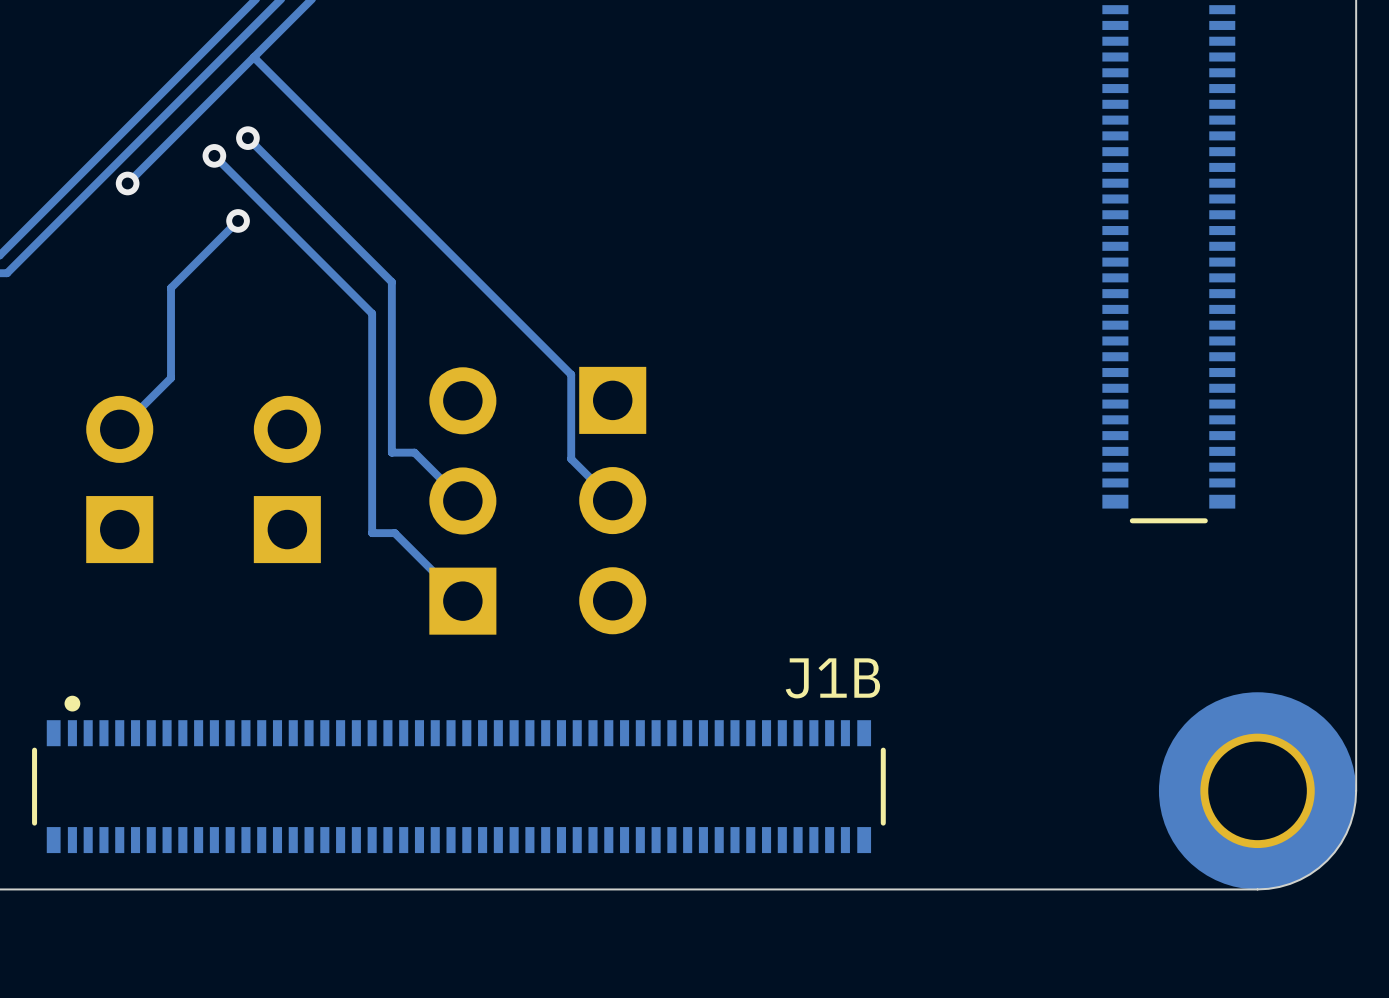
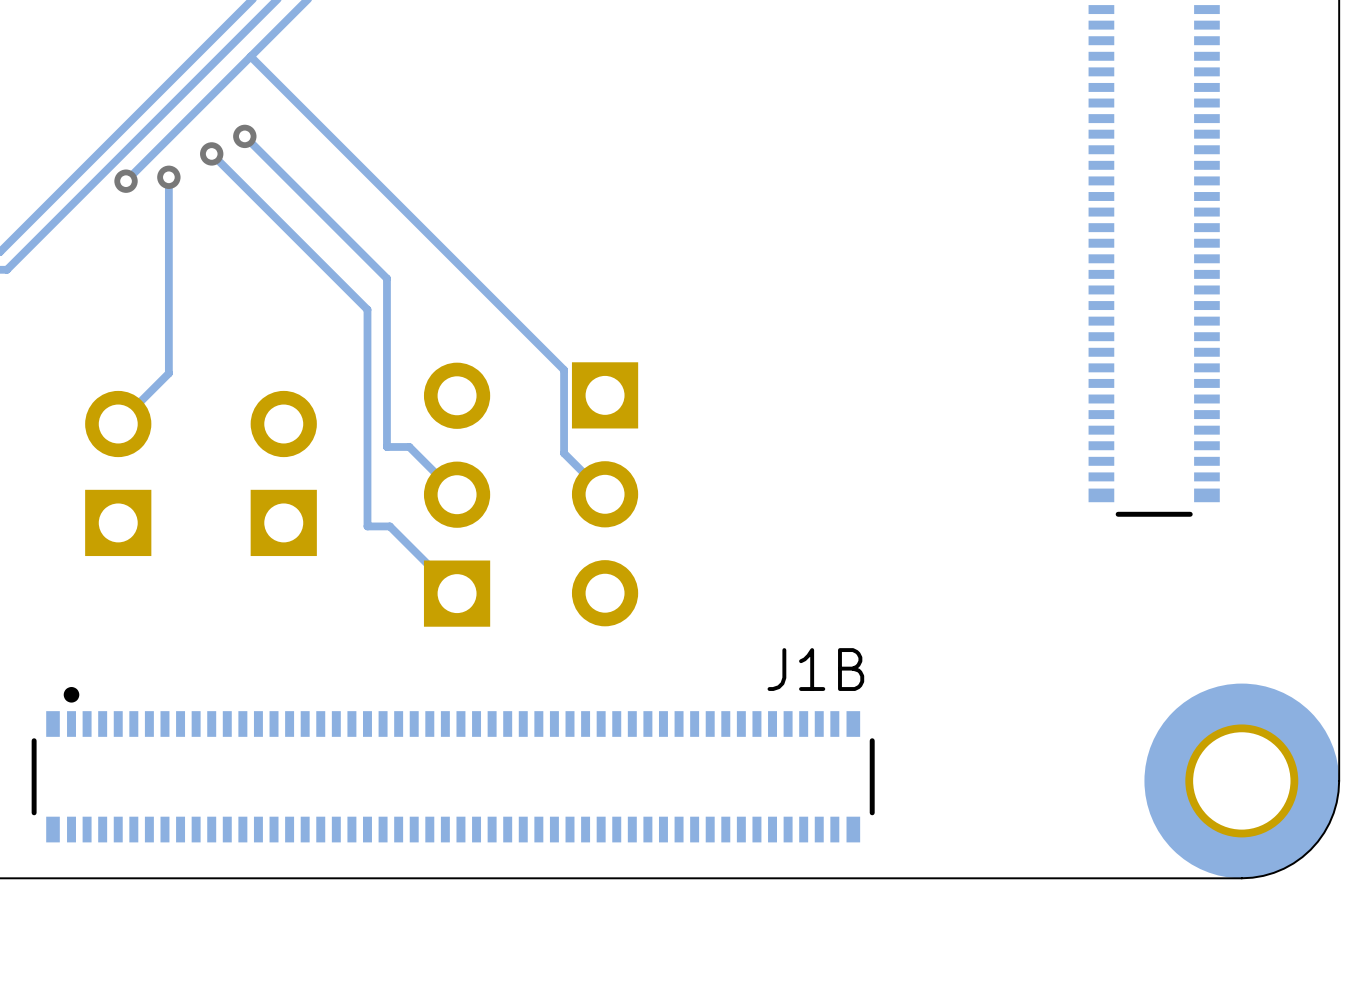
track: (238, 220) (171, 288) -> (168, 177) (168, 284)
via position: (238, 220) -> (168, 177)

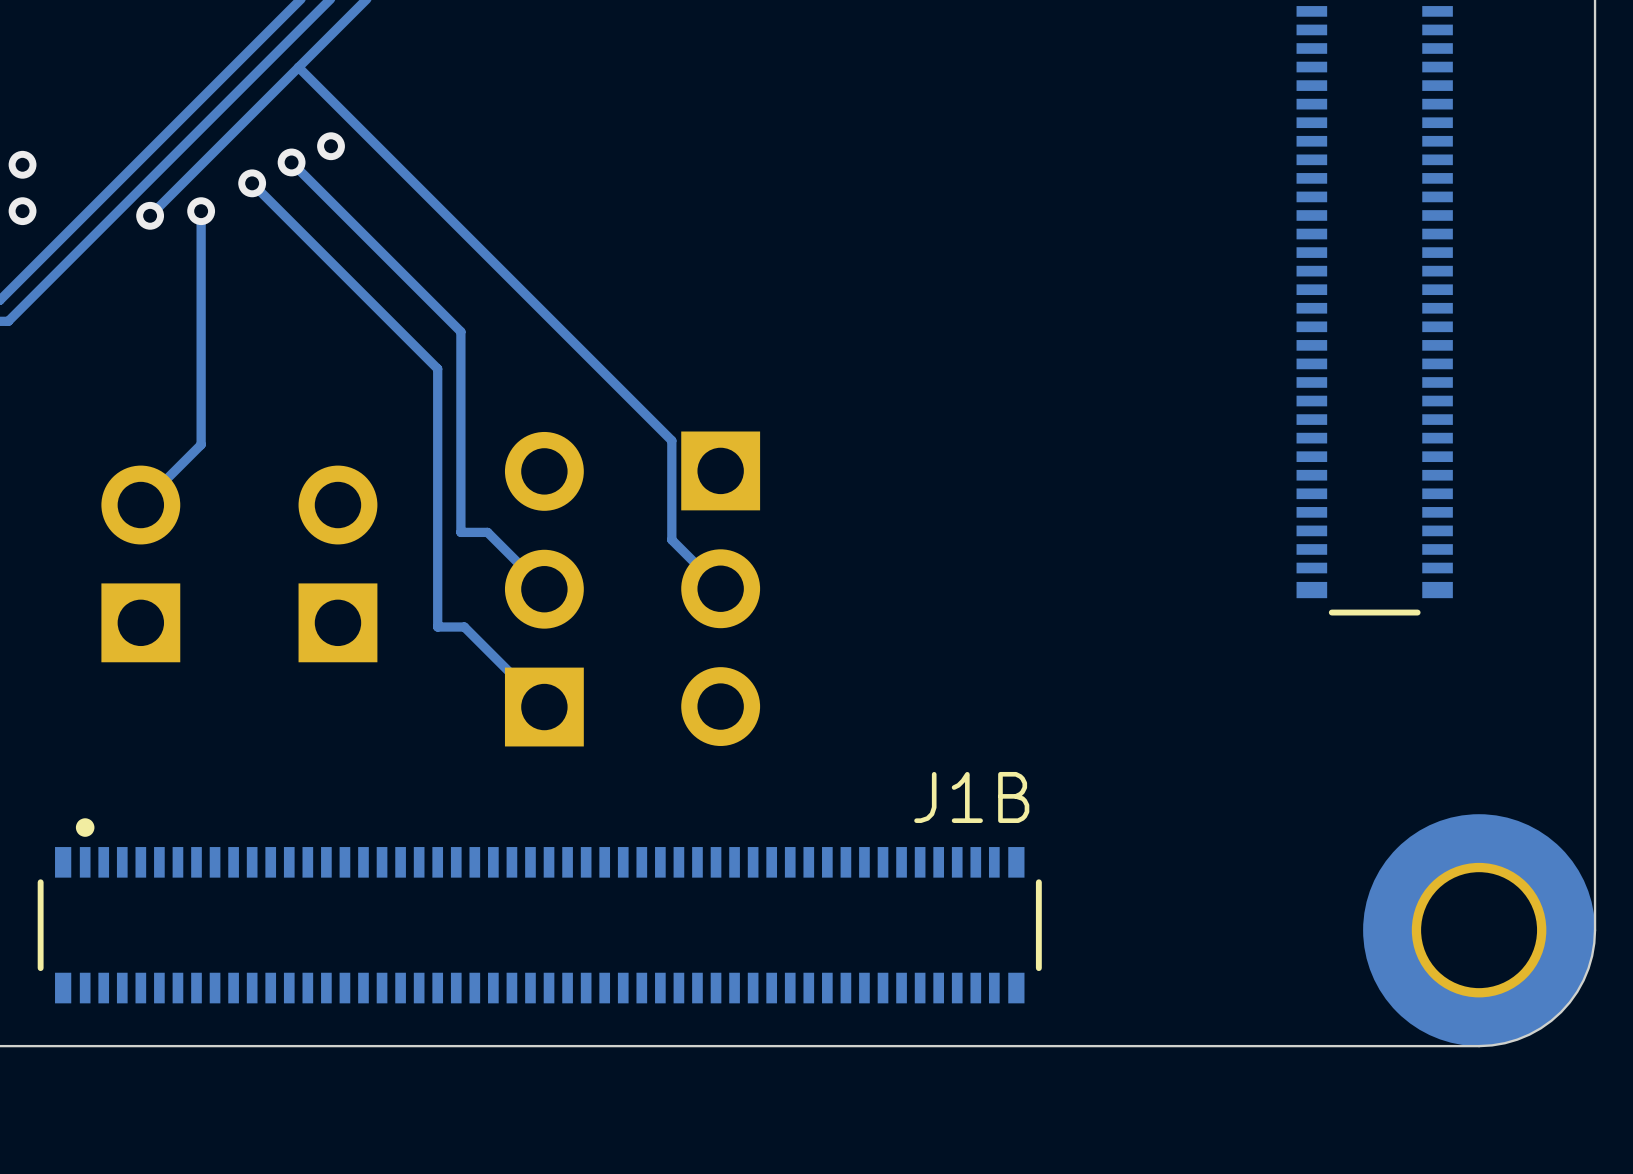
via: none -> (331, 146)
via: none -> (22, 164)
via: none -> (22, 211)

